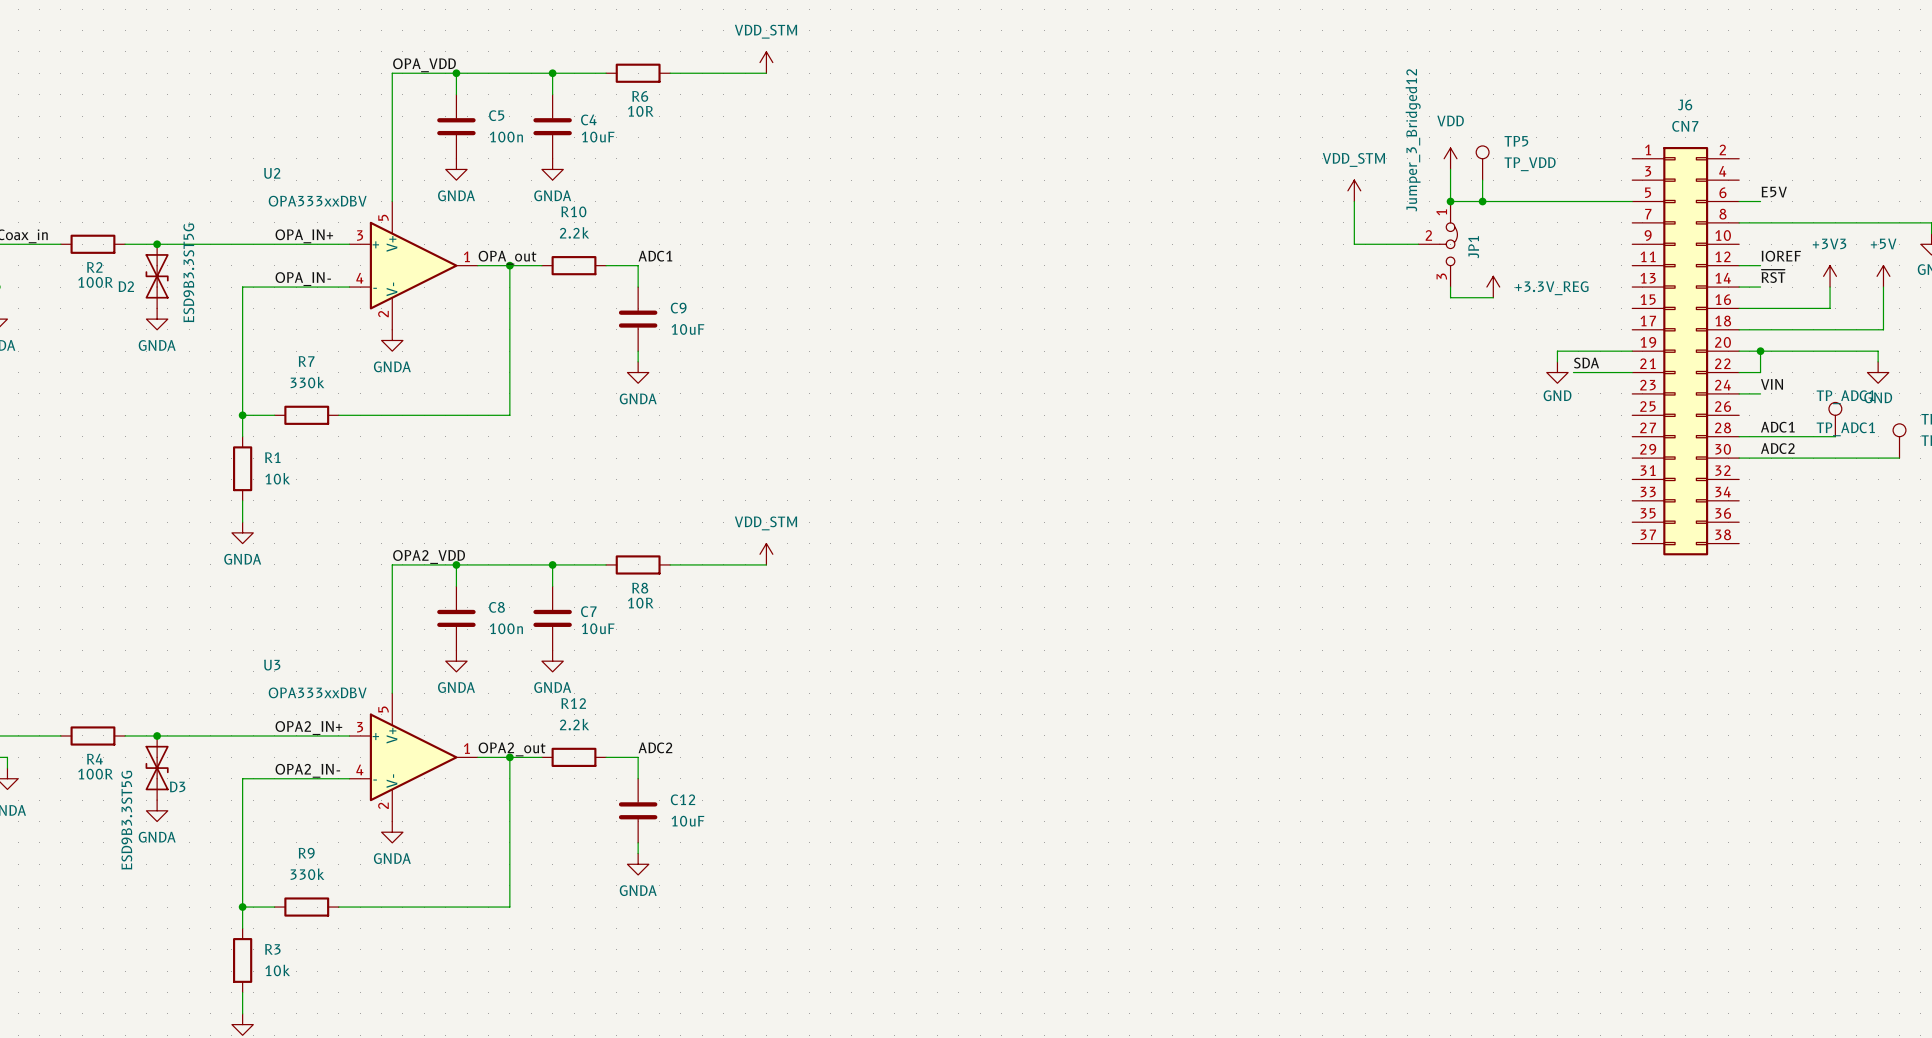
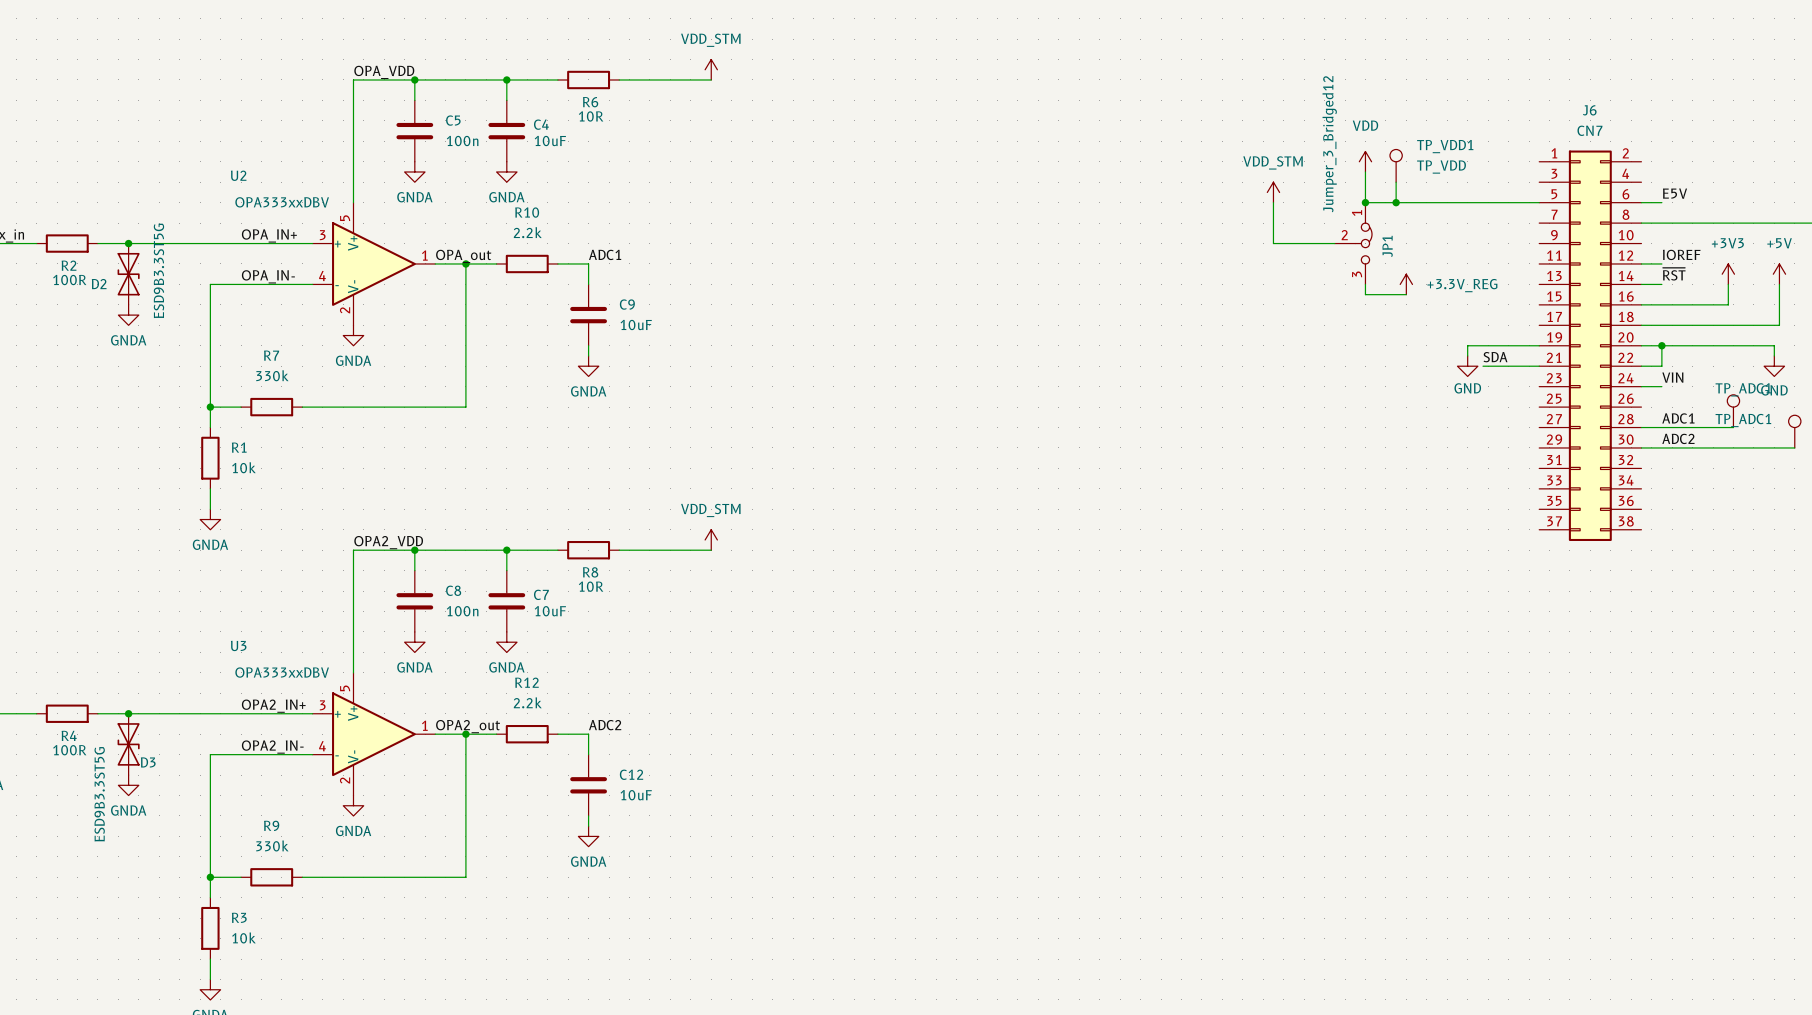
TP5 name: TP5 (1516, 141) -> TP_VDD1 (1445, 146)

